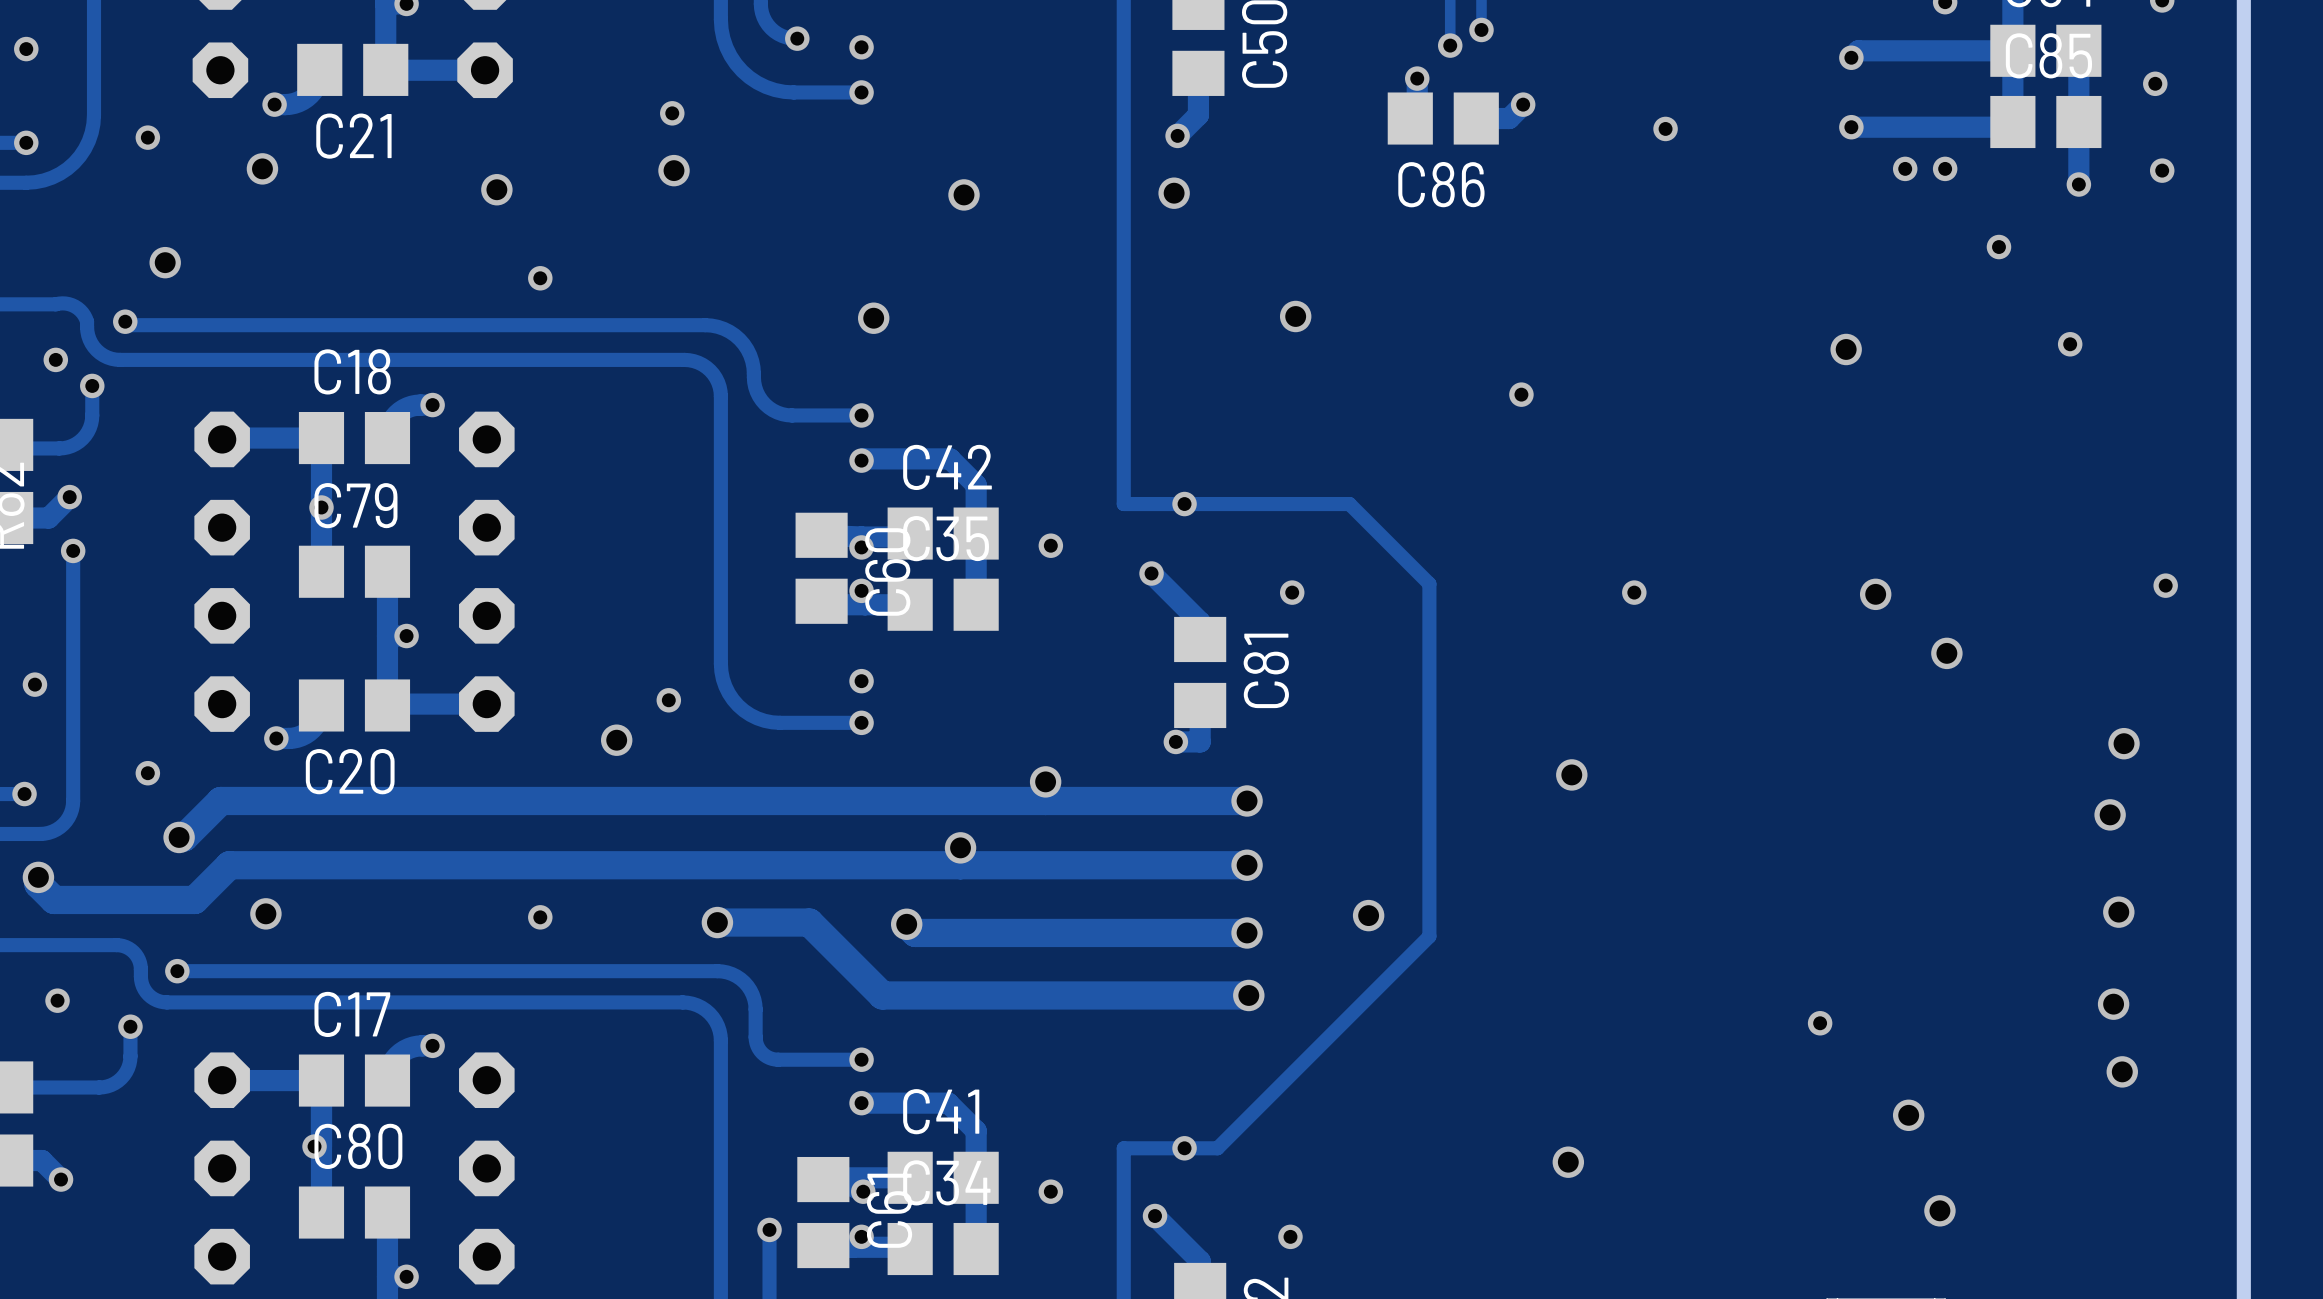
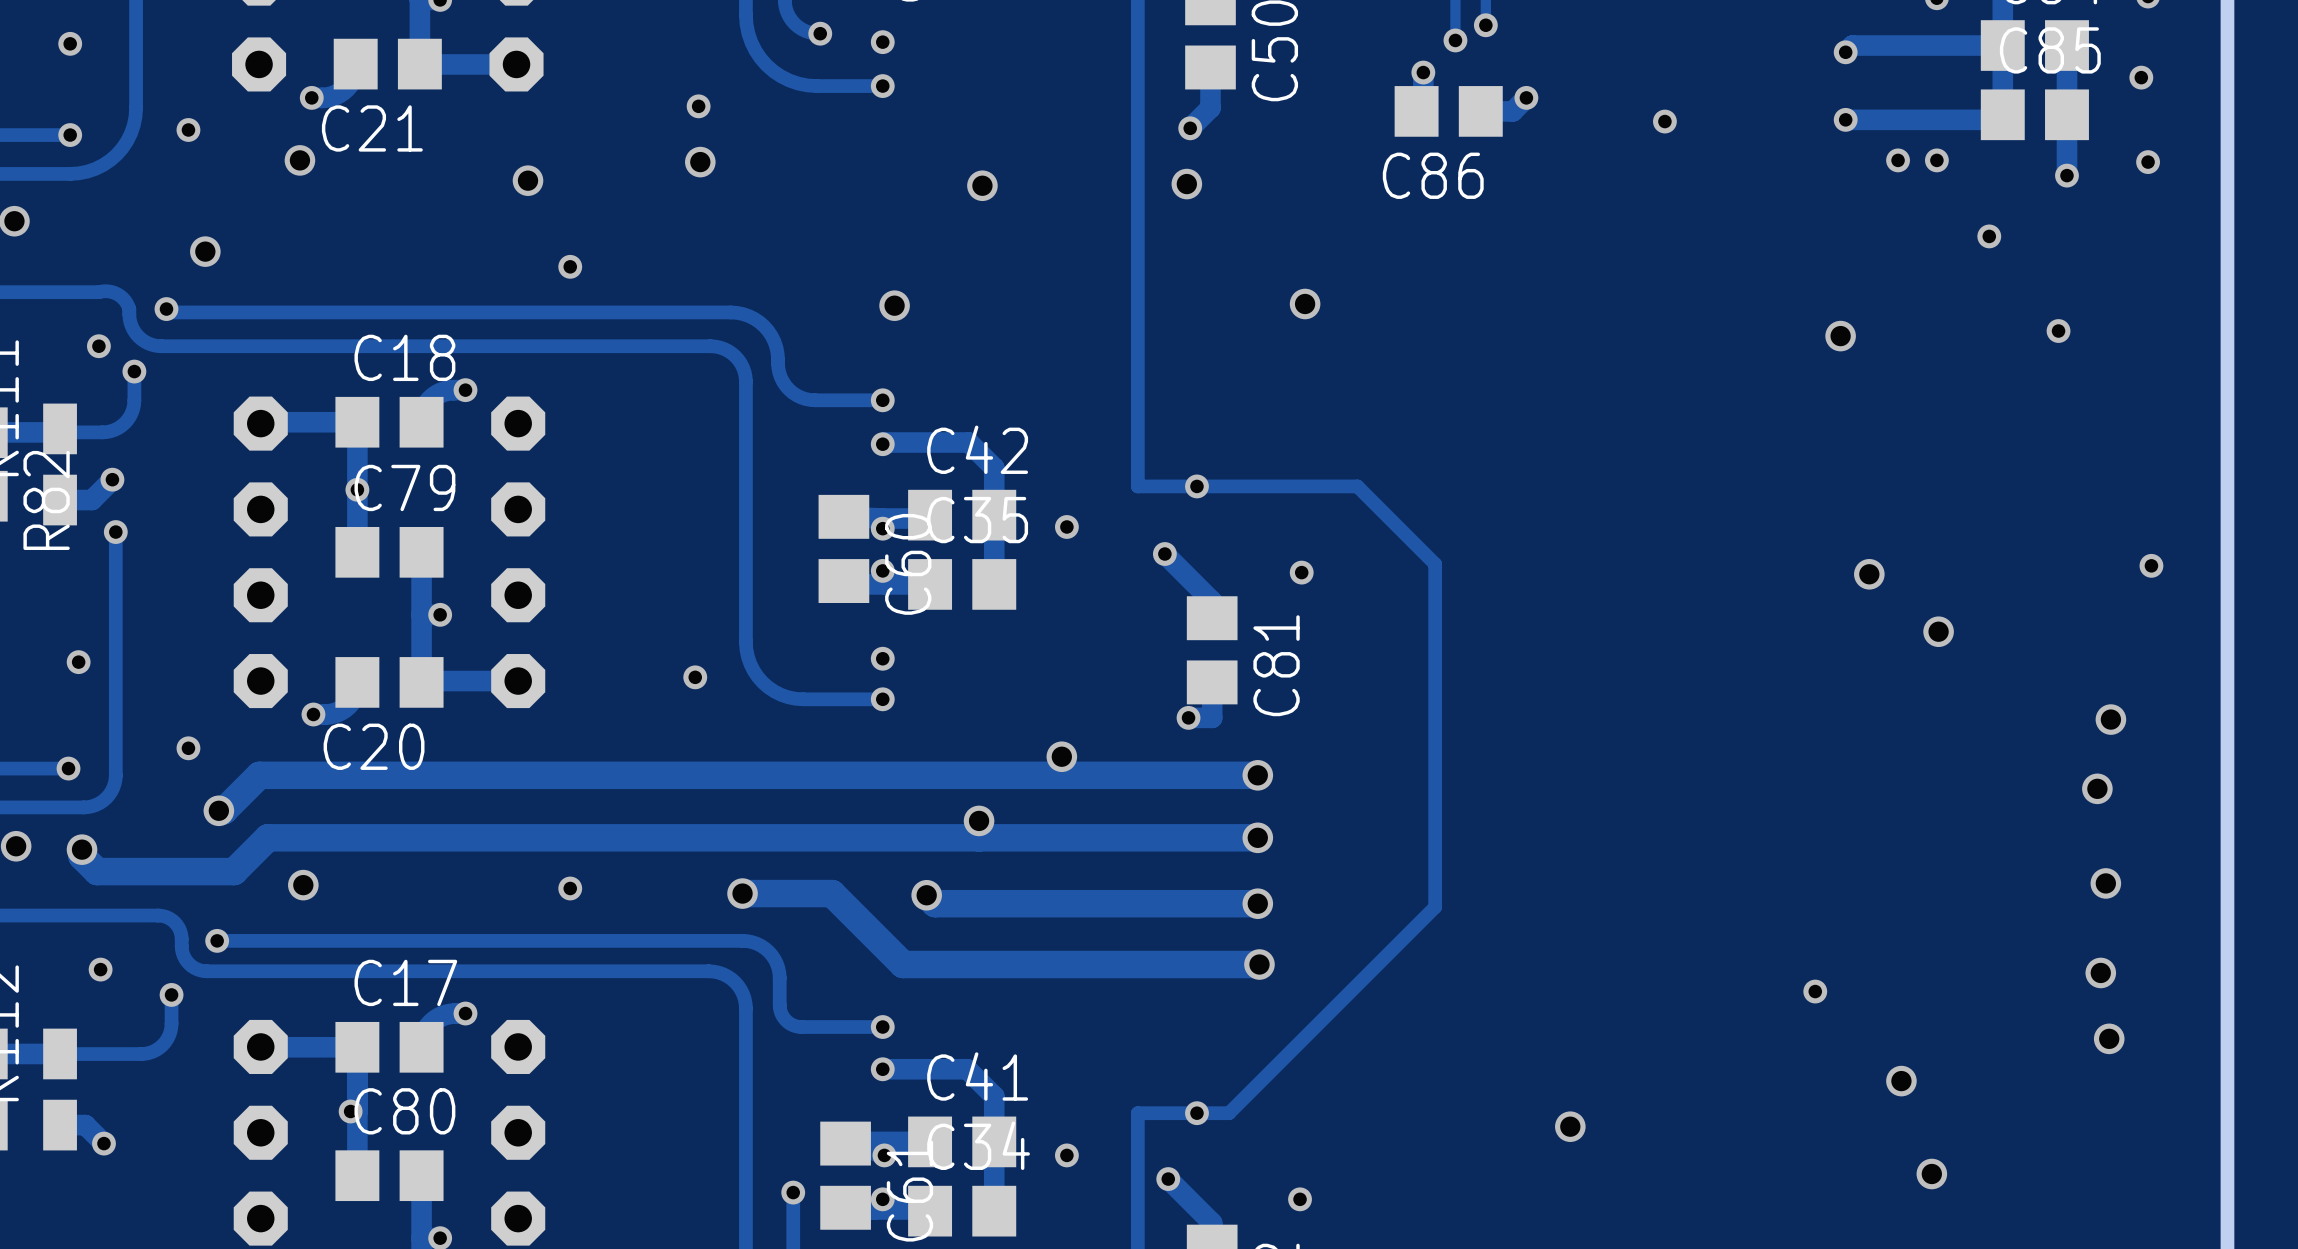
via: (1521, 394) -> none
via: (1634, 592) -> none
via: (616, 740) -> none
via: (1571, 774) -> none
via: (1368, 915) -> none

